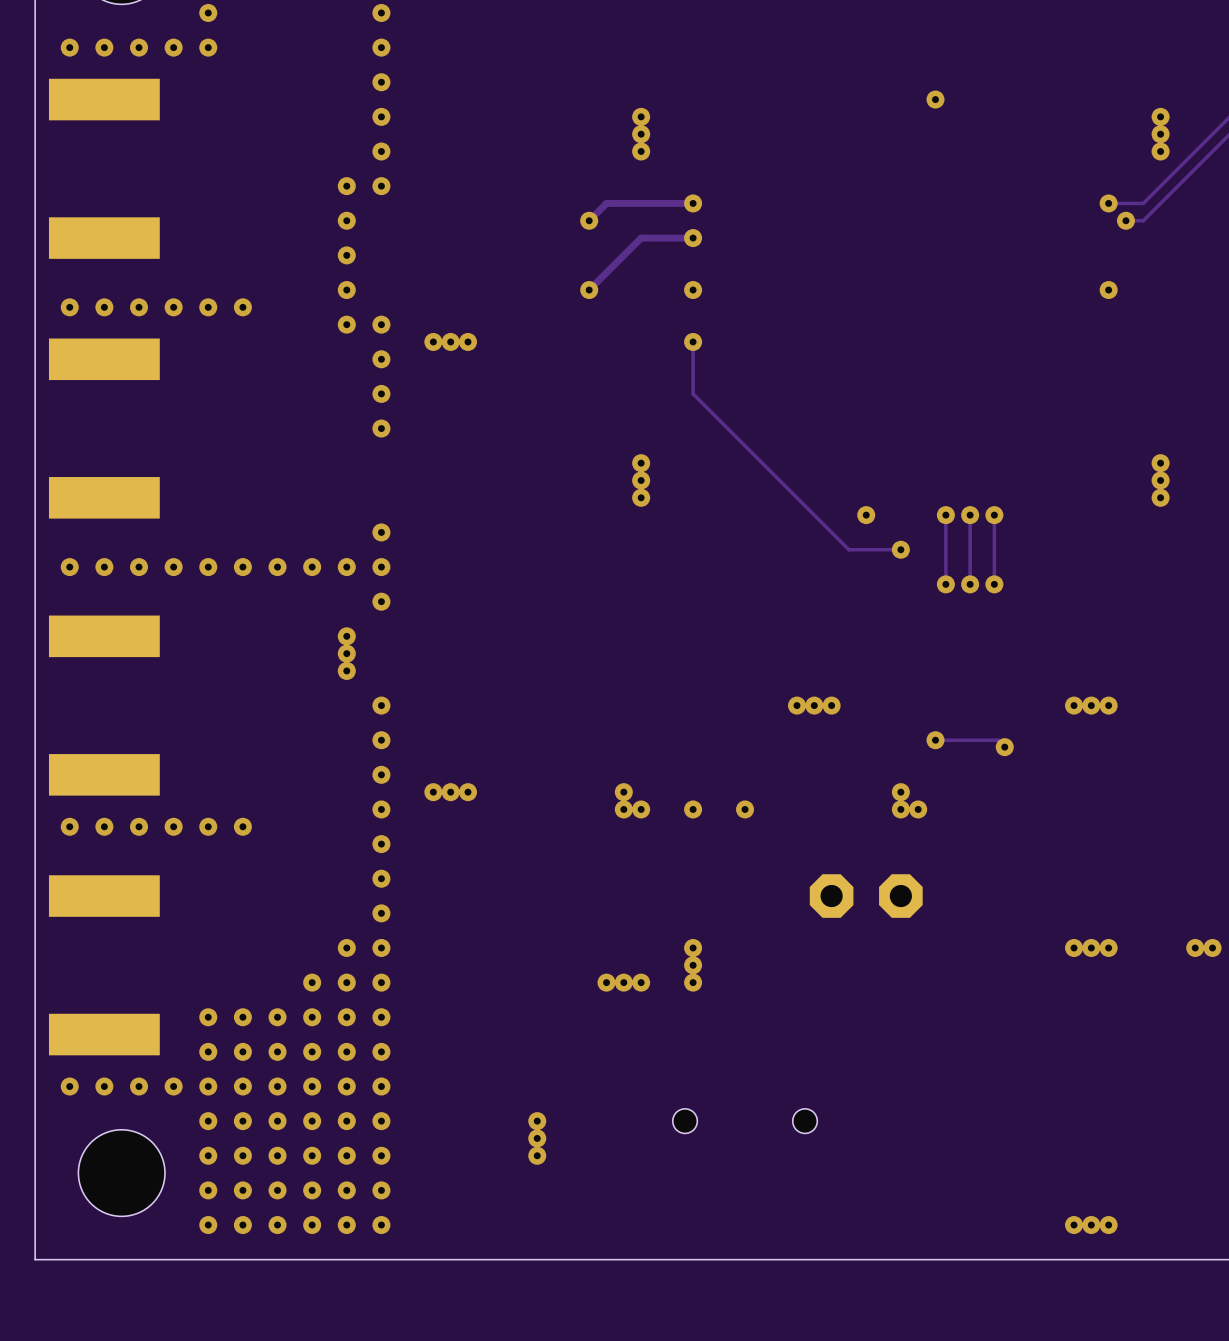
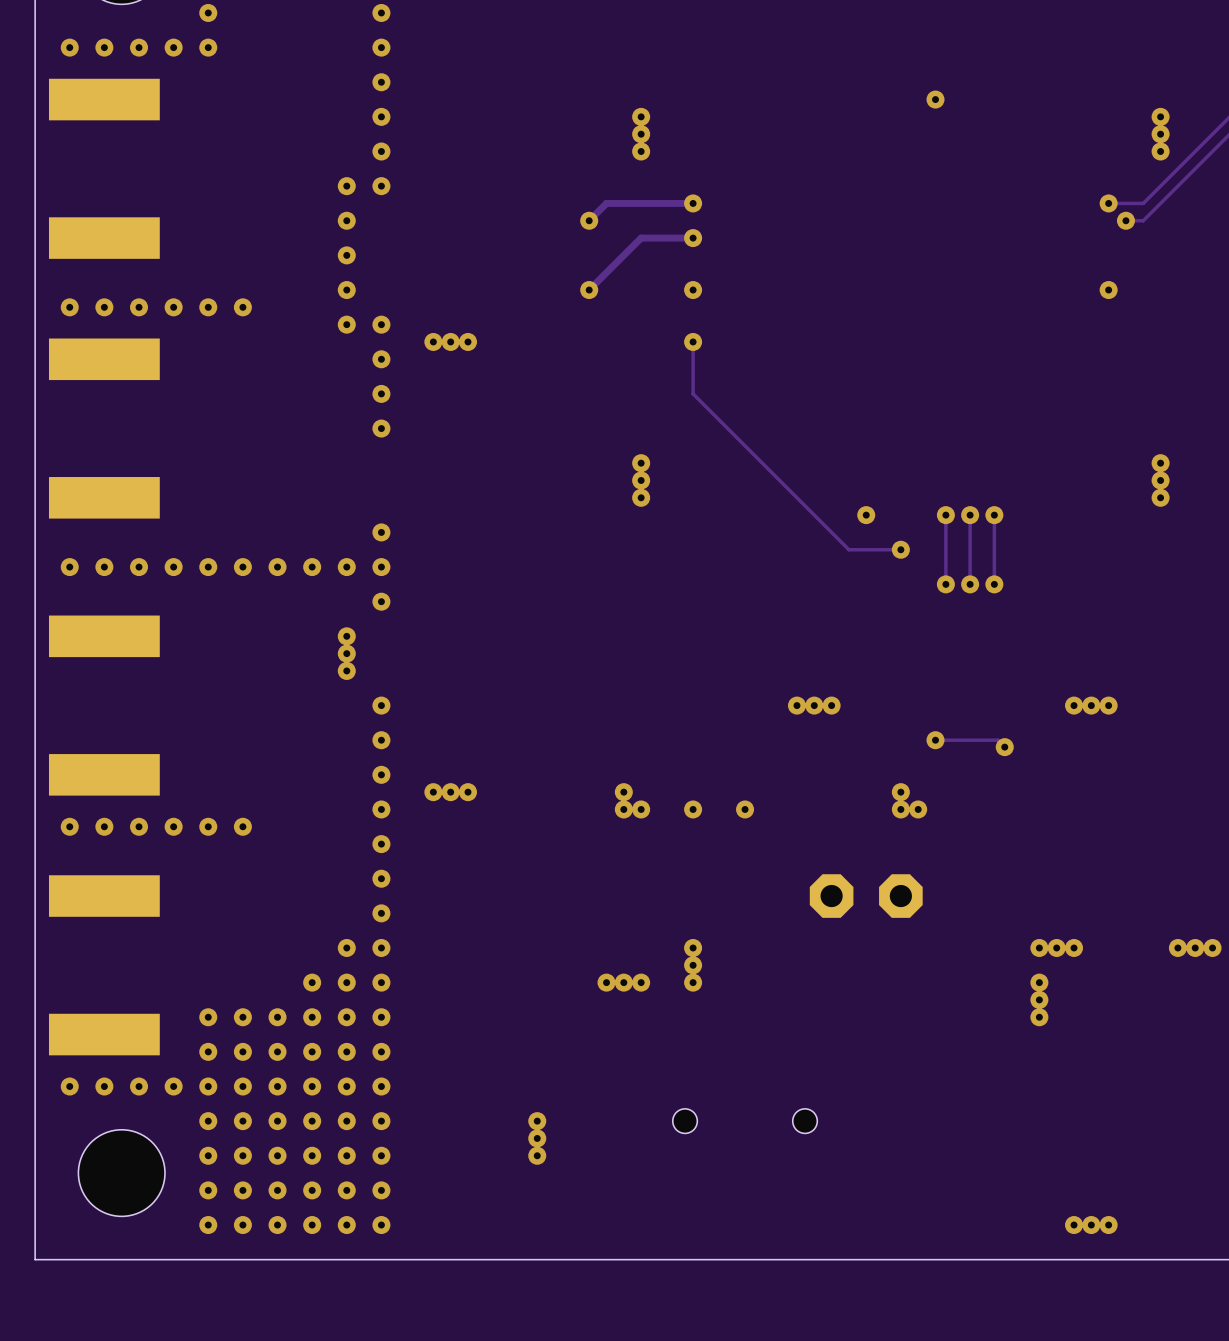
via: none -> (1039, 947)
via: none -> (1056, 947)
via: (1091, 947) -> none
via: (1108, 947) -> none
via: none -> (1177, 947)
via: none -> (1039, 982)
via: none -> (1039, 999)
via: none -> (1039, 1017)

